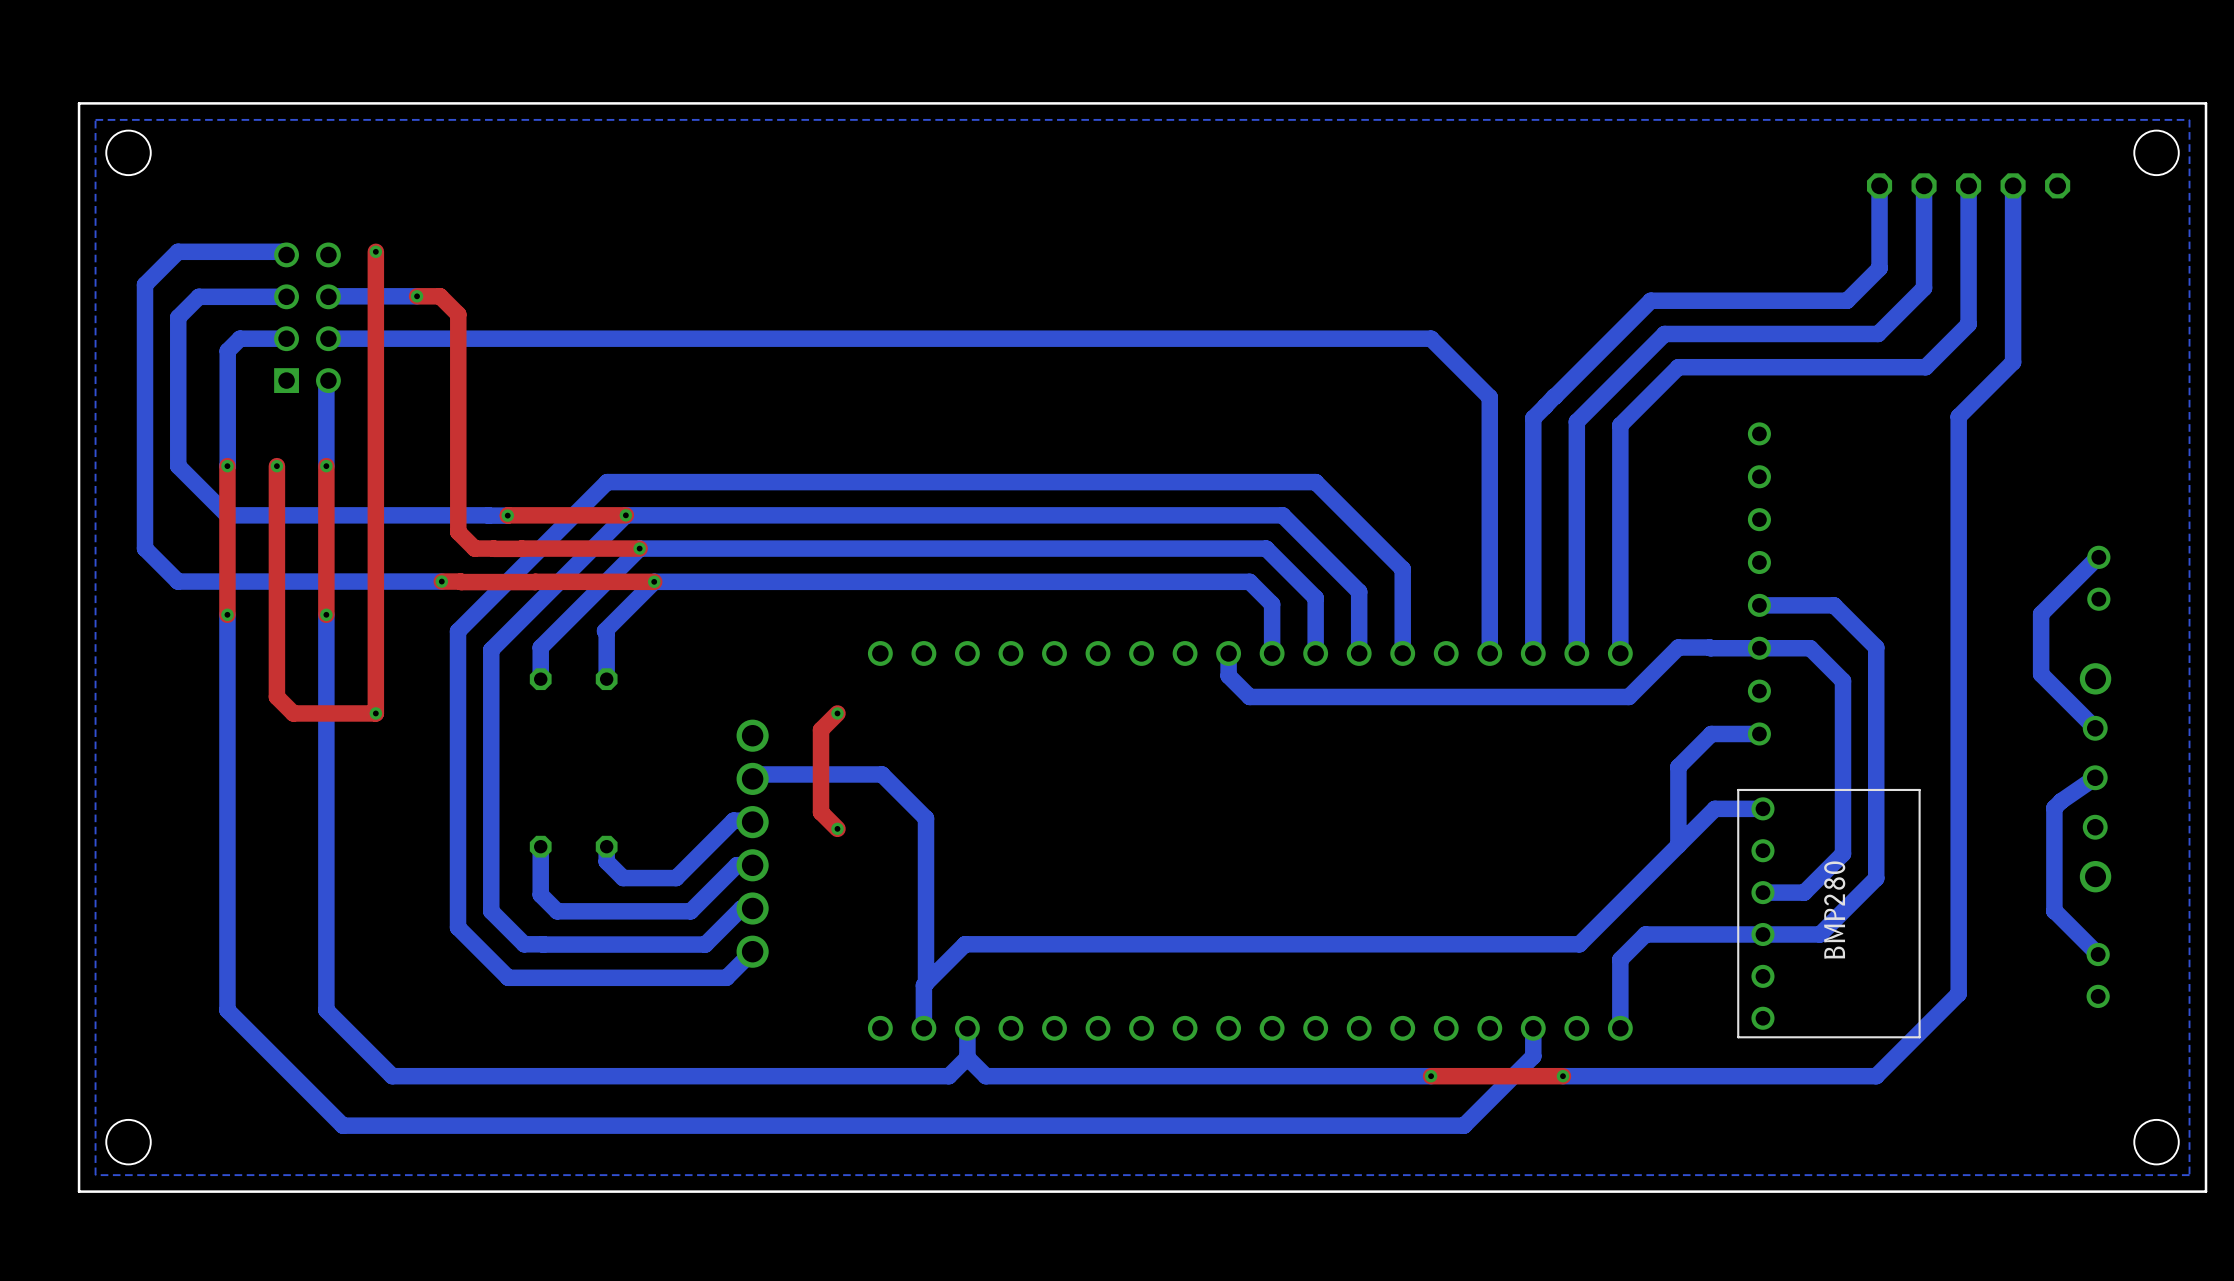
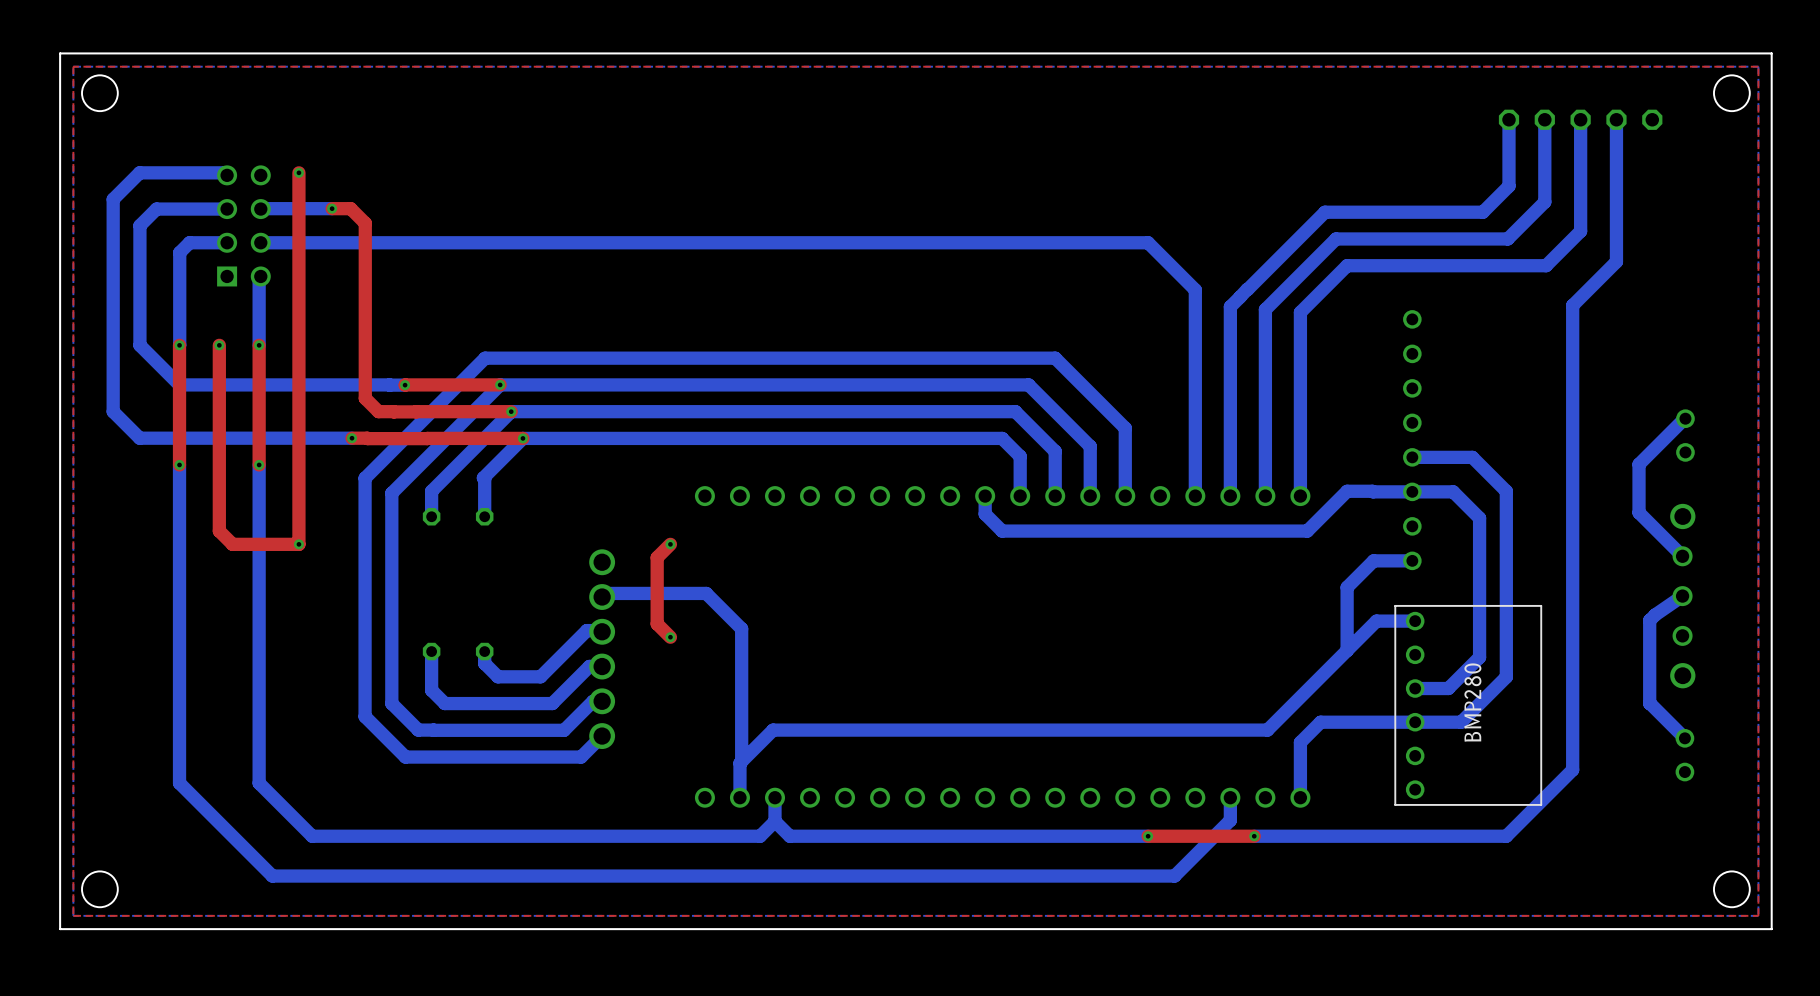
top zone outline: none -> (73, 66) (73, 915) (1758, 915) (1758, 66) (73, 66)

